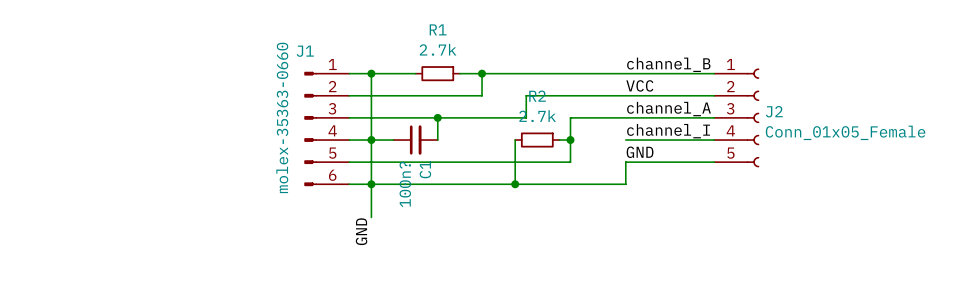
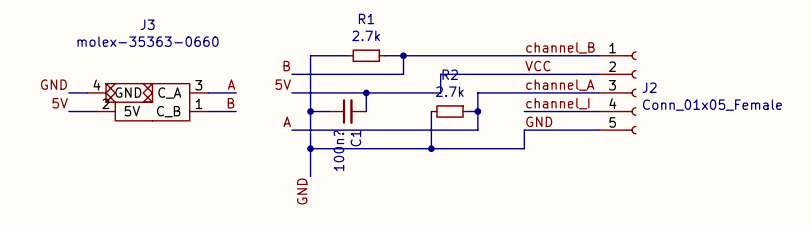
wire: (349, 73) (371, 73) -> none
junction: (371, 73) -> none
label: none -> B (286, 66)
label: none -> GND (53, 84)
label: none -> A (231, 84)
label: none -> 5V (283, 84)
J3: none -> molex-35363-0660 (147, 88)
wire: none -> (68, 92) (87, 92)
wire: none -> (208, 92) (236, 92)
J1: molex-35363-0660 (326, 128) -> none
label: none -> 5V (60, 103)
label: none -> B (231, 103)
wire: none -> (68, 111) (96, 111)
wire: none -> (208, 111) (236, 111)
wire: (349, 140) (371, 140) -> none
label: none -> A (287, 121)
wire: (349, 184) (371, 184) -> none

